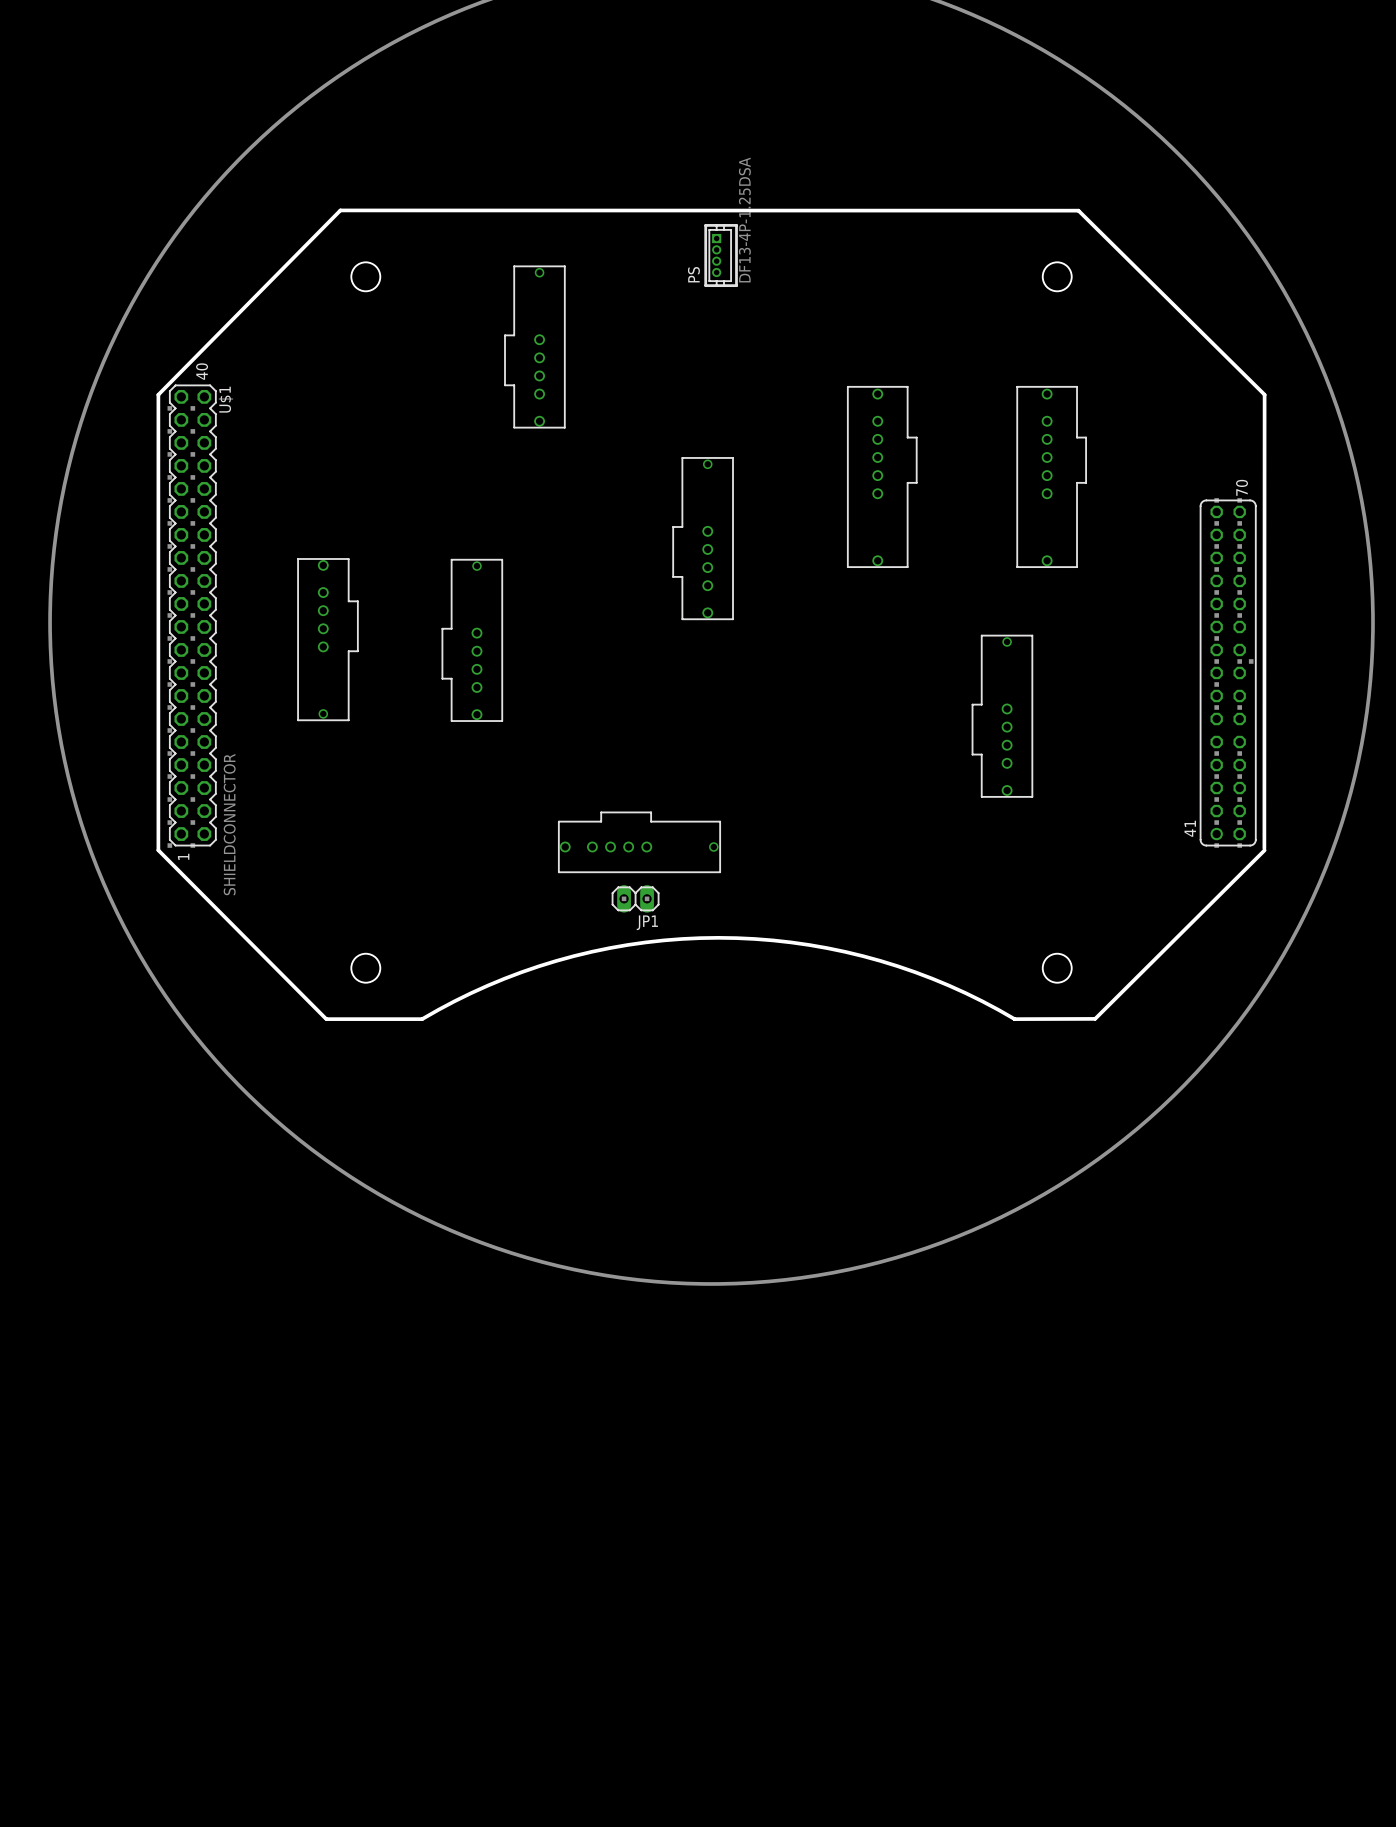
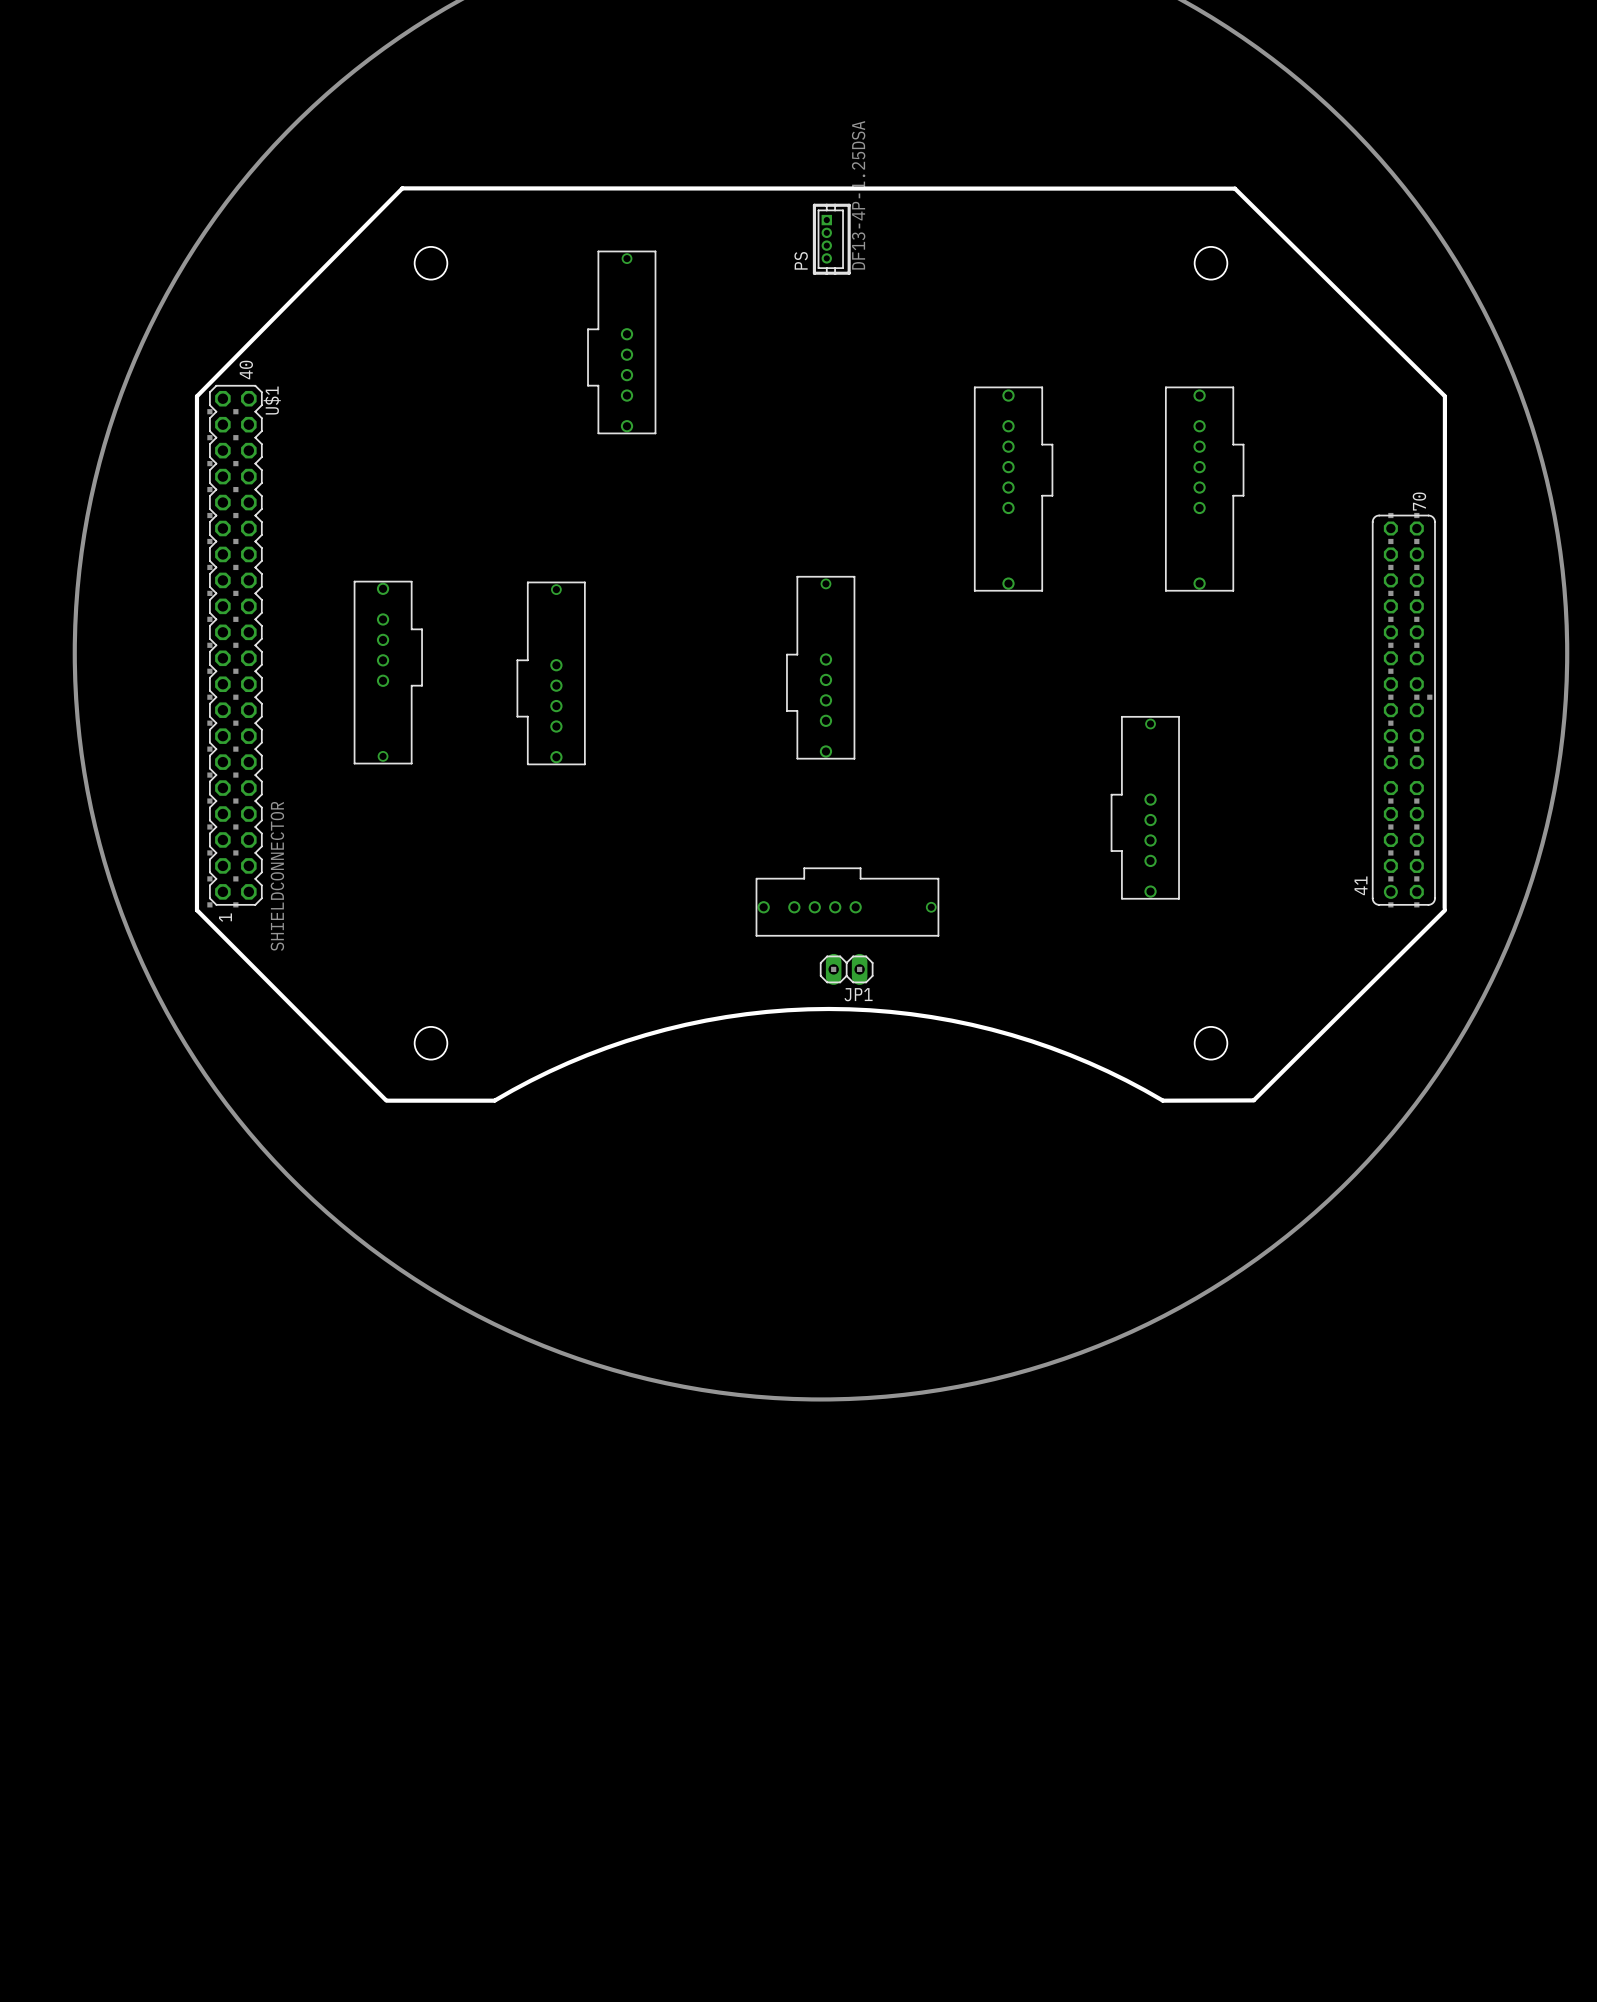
part position: (703, 538) -> (820, 667)
part position: (1002, 716) -> (1145, 807)
part position: (639, 842) -> (847, 902)
JP1 position: (635, 898) -> (846, 969)

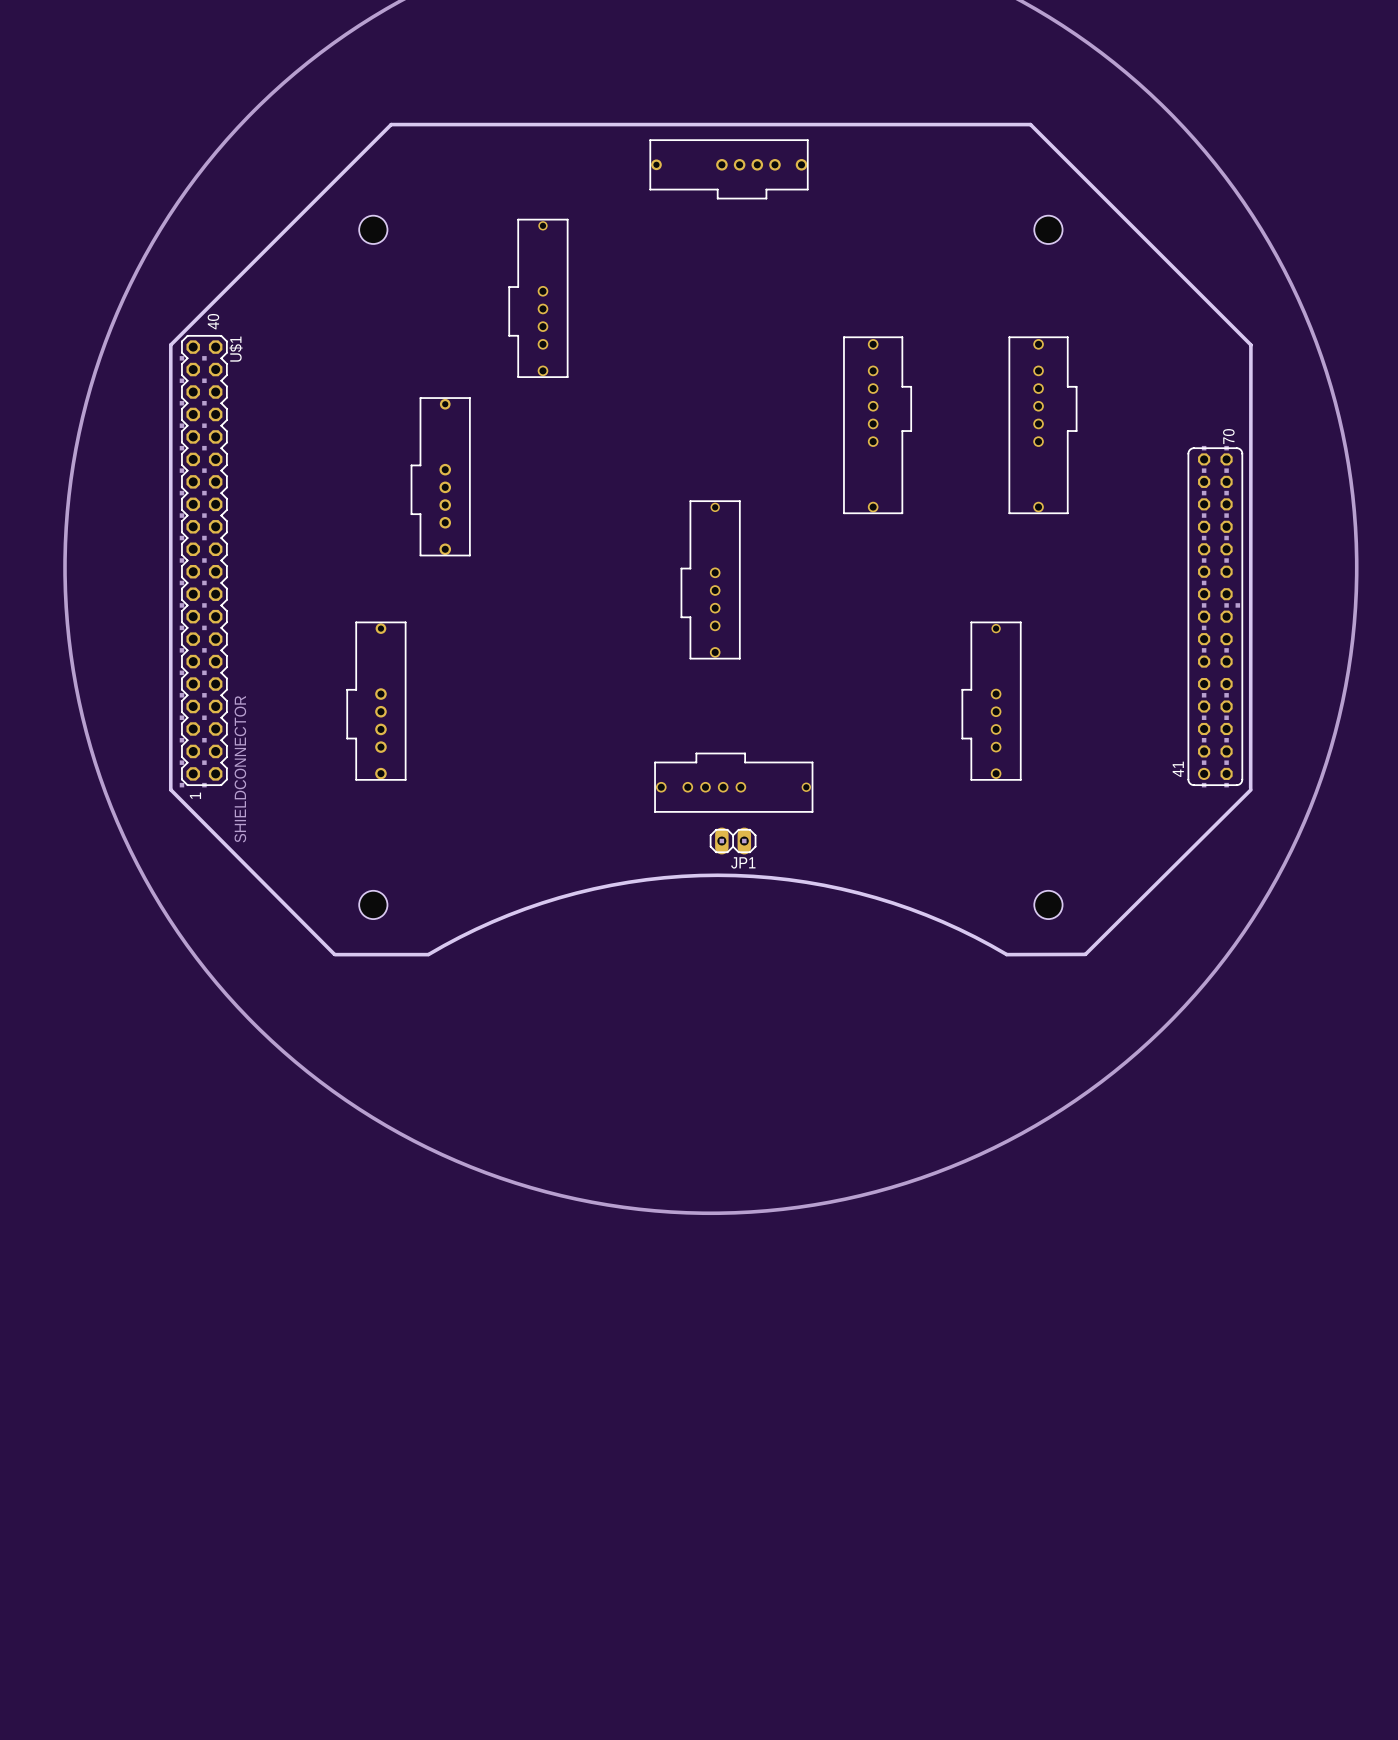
part: none -> (729, 169)
PS: DF13-4P-1.25DSA (831, 239) -> none
board edge: (196, 396) (402, 188) (1234, 188) (1444, 396) -> (170, 344) (391, 124) (1030, 124) (1250, 344)
part: none -> (440, 476)
part: (388, 672) -> none
part: (551, 673) -> none
part: none -> (376, 701)

